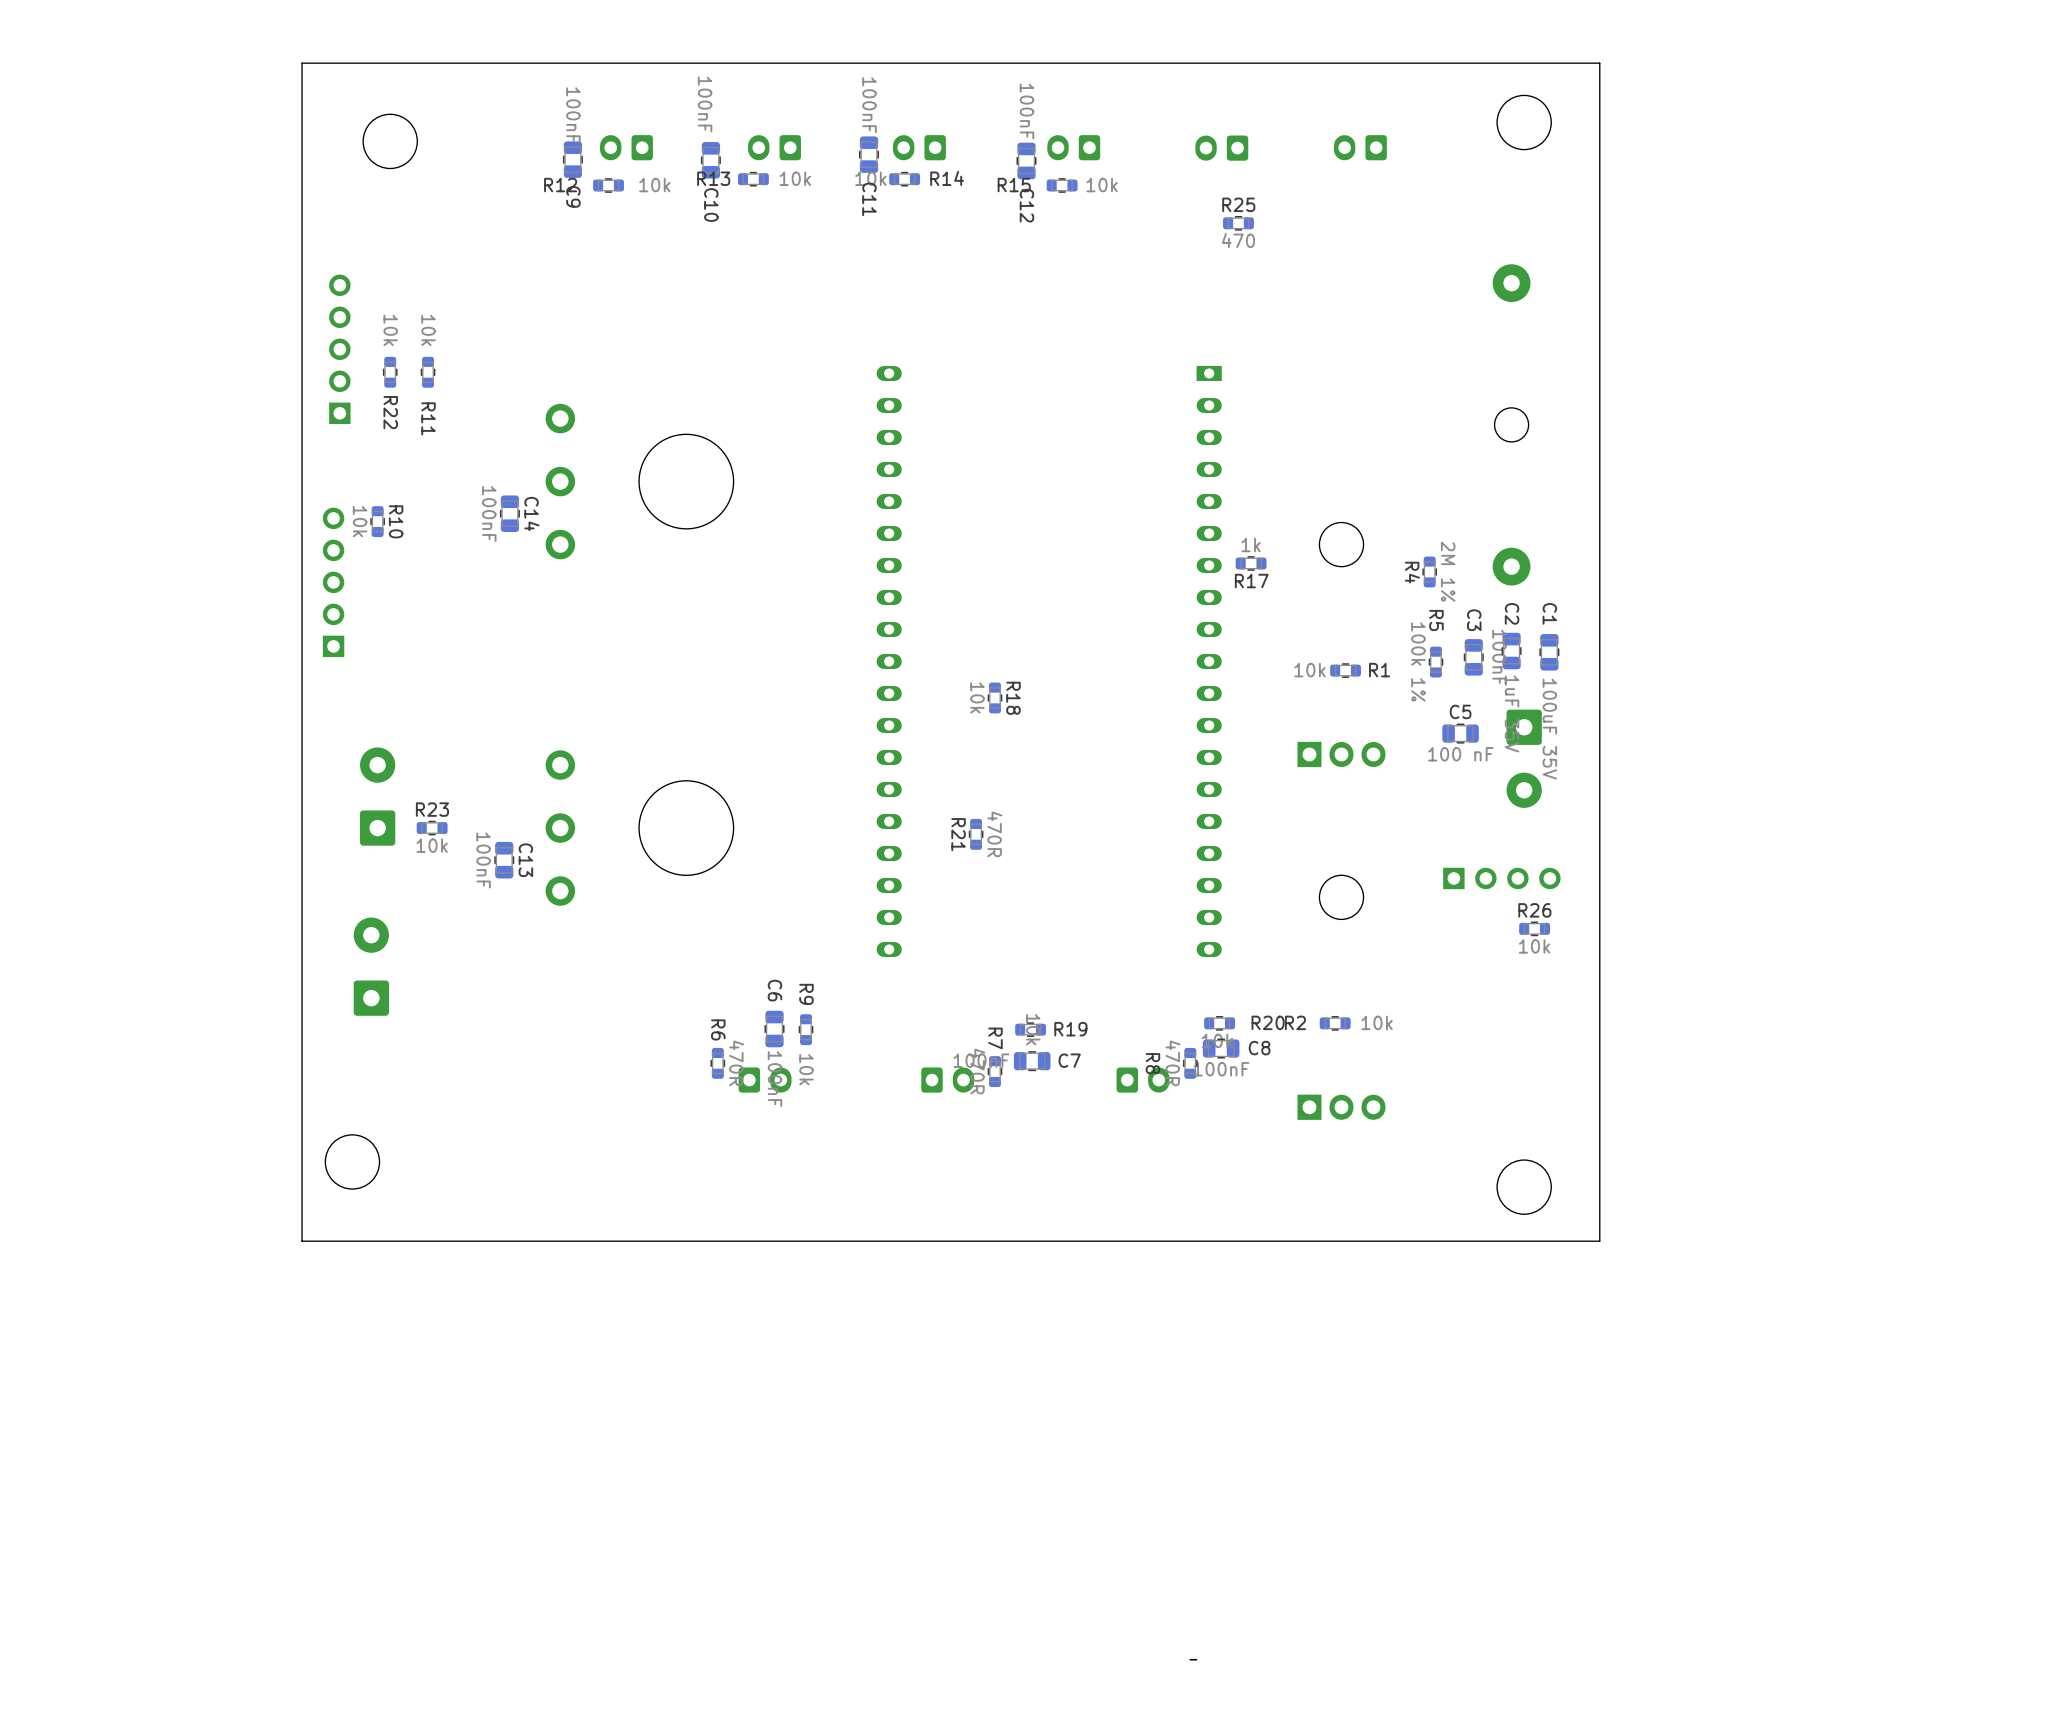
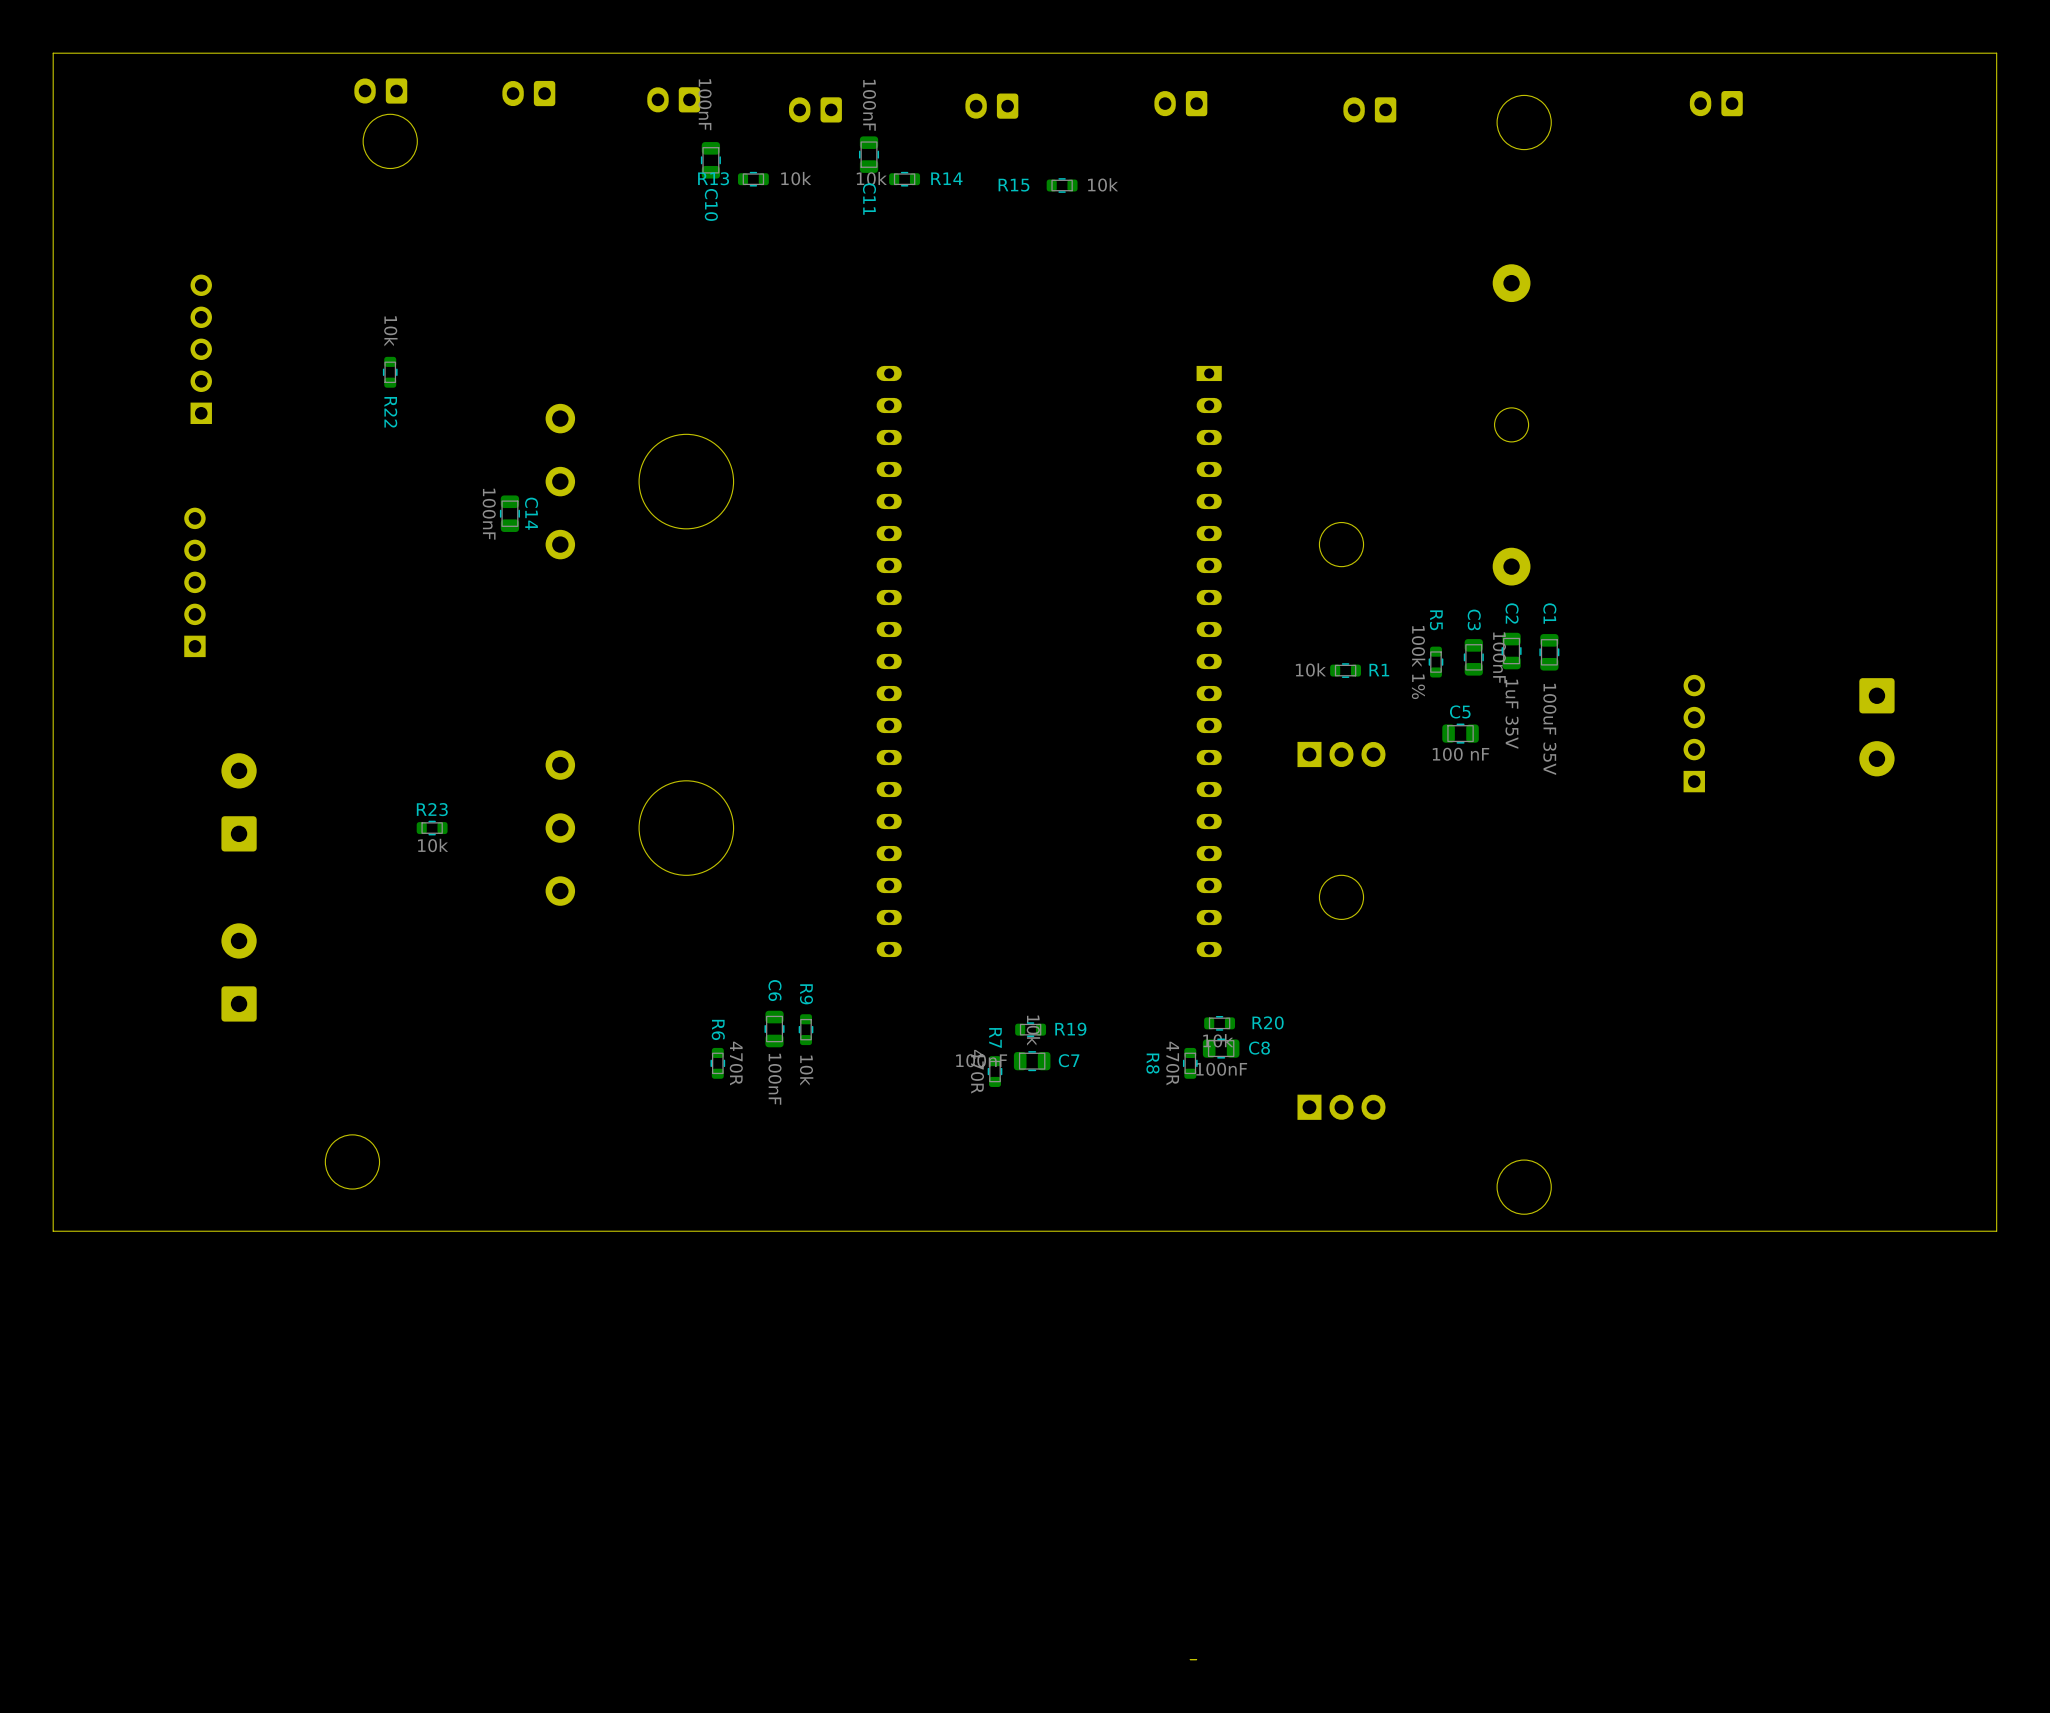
board edge: (1599, 63) (302, 63) (302, 1241) (1599, 1241) (1599, 63) -> (1996, 53) (1996, 1231) (53, 1231) (53, 53) (1996, 53)
part: none -> (380, 91)
part: none -> (528, 93)
part: none -> (673, 99)
part: none -> (1180, 103)
part: none -> (1716, 103)
part: none -> (991, 106)
part: none -> (815, 109)
part: (626, 147) -> none
part: (774, 147) -> none
part: (919, 147) -> none
part: (1073, 147) -> none
part position: (1360, 147) -> (1369, 109)
part: (1221, 148) -> none
C9: 100nF (572, 159) -> none
C12: 100nF (1026, 160) -> none
R12: 10k (608, 185) -> none
R25: 470 (1238, 223) -> none
part: none -> (201, 349)
part: (339, 349) -> none
R11: 10k (428, 372) -> none
R10: 10k (377, 521) -> none
R17: 1k (1251, 563) -> none
R4: 2M 1% (1429, 571) -> none
part: none -> (194, 582)
part: (333, 582) -> none
R18: 10k (995, 697) -> none
part: none -> (1876, 727)
part: (1524, 758) -> none
part: (377, 796) -> none
part: none -> (239, 802)
R21: 470R (976, 834) -> none
C13: 100nF (504, 860) -> none
part rotation: 0° (1501, 878) -> 90° counterclockwise (1694, 733)
part position: (1501, 878) -> (1694, 733)
R26: 10k (1534, 928) -> none
part: (371, 966) -> none
part: none -> (239, 972)
R2: 10k (1335, 1023) -> none
part: (765, 1080) -> none
part: (947, 1080) -> none
part: (1143, 1080) -> none

